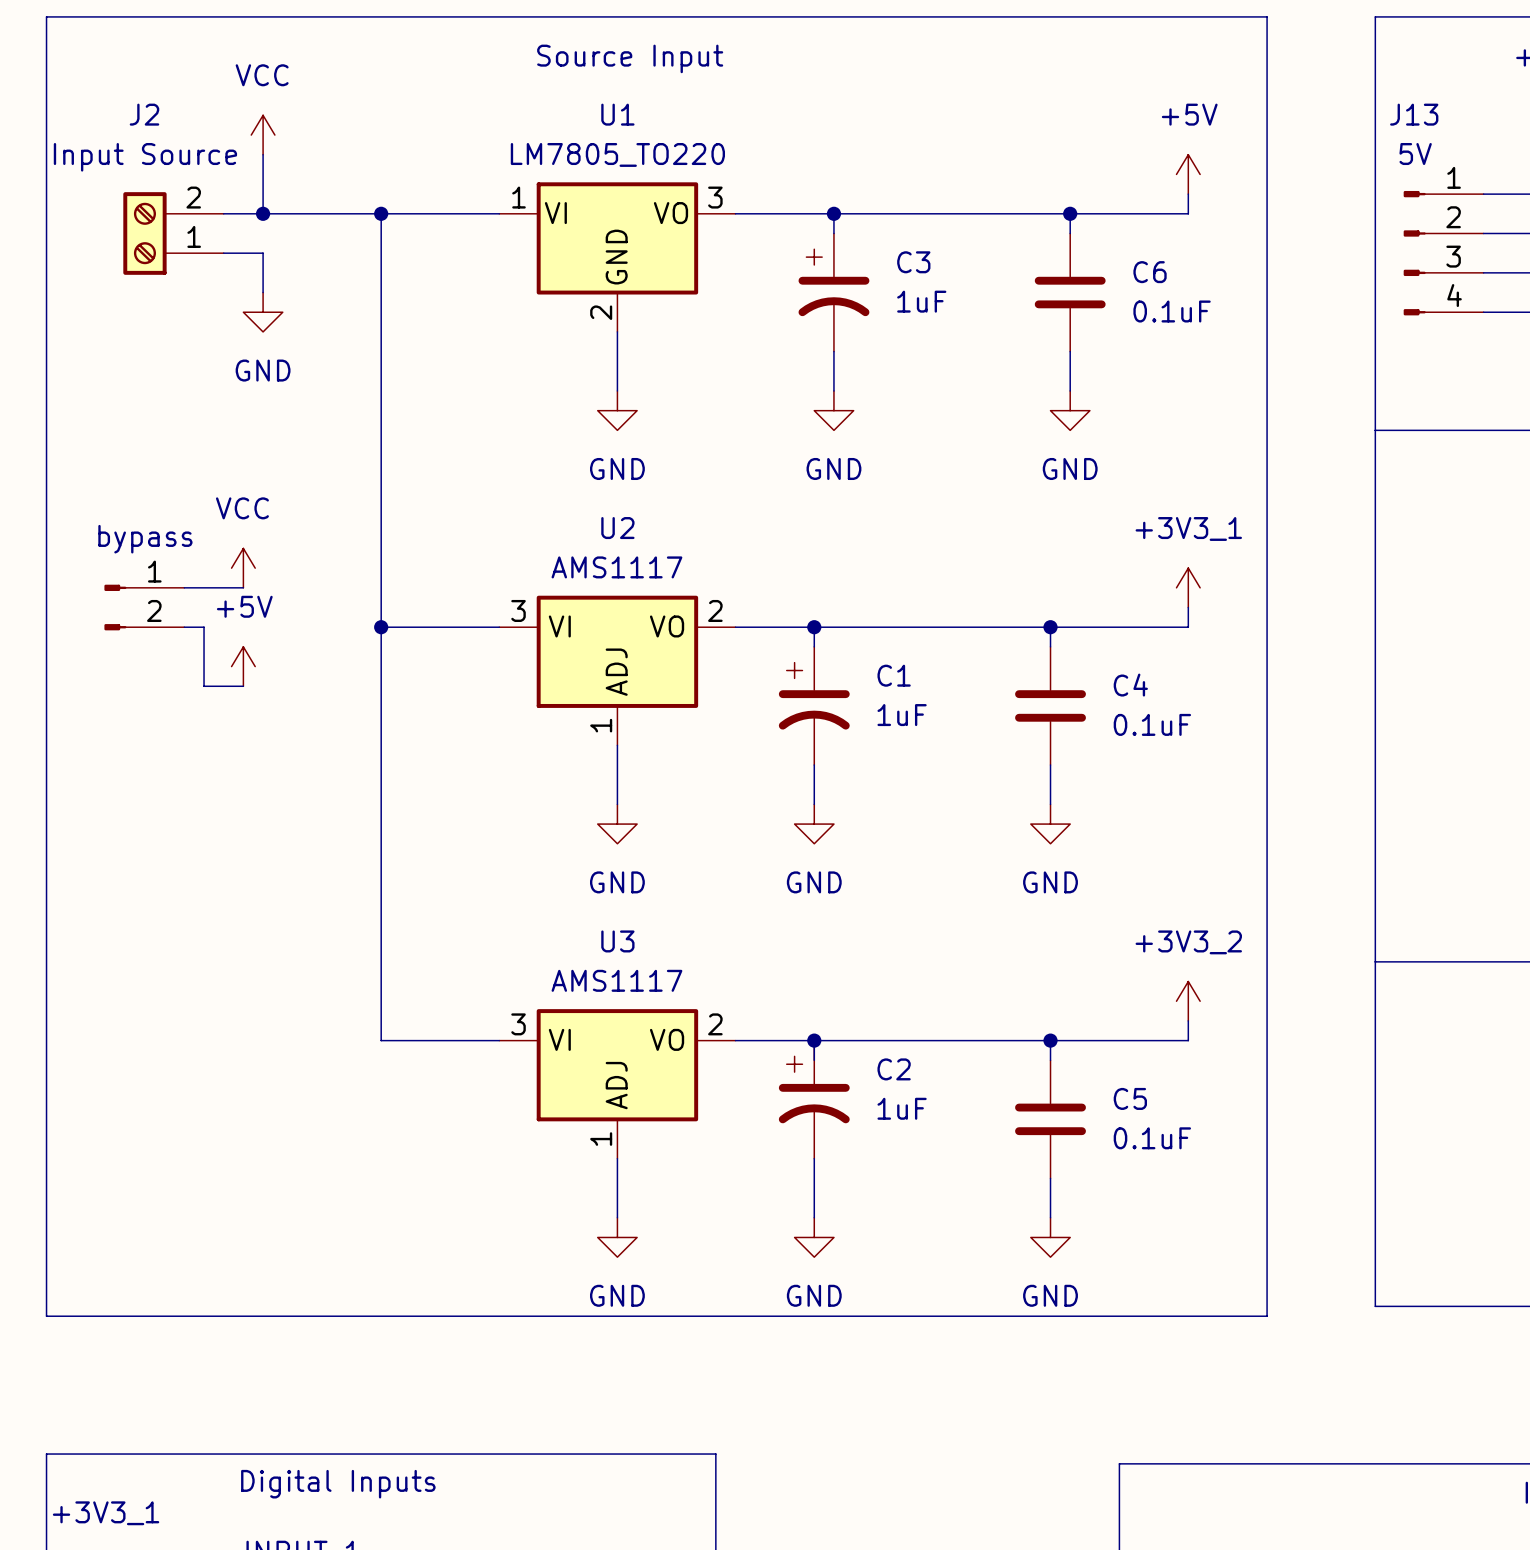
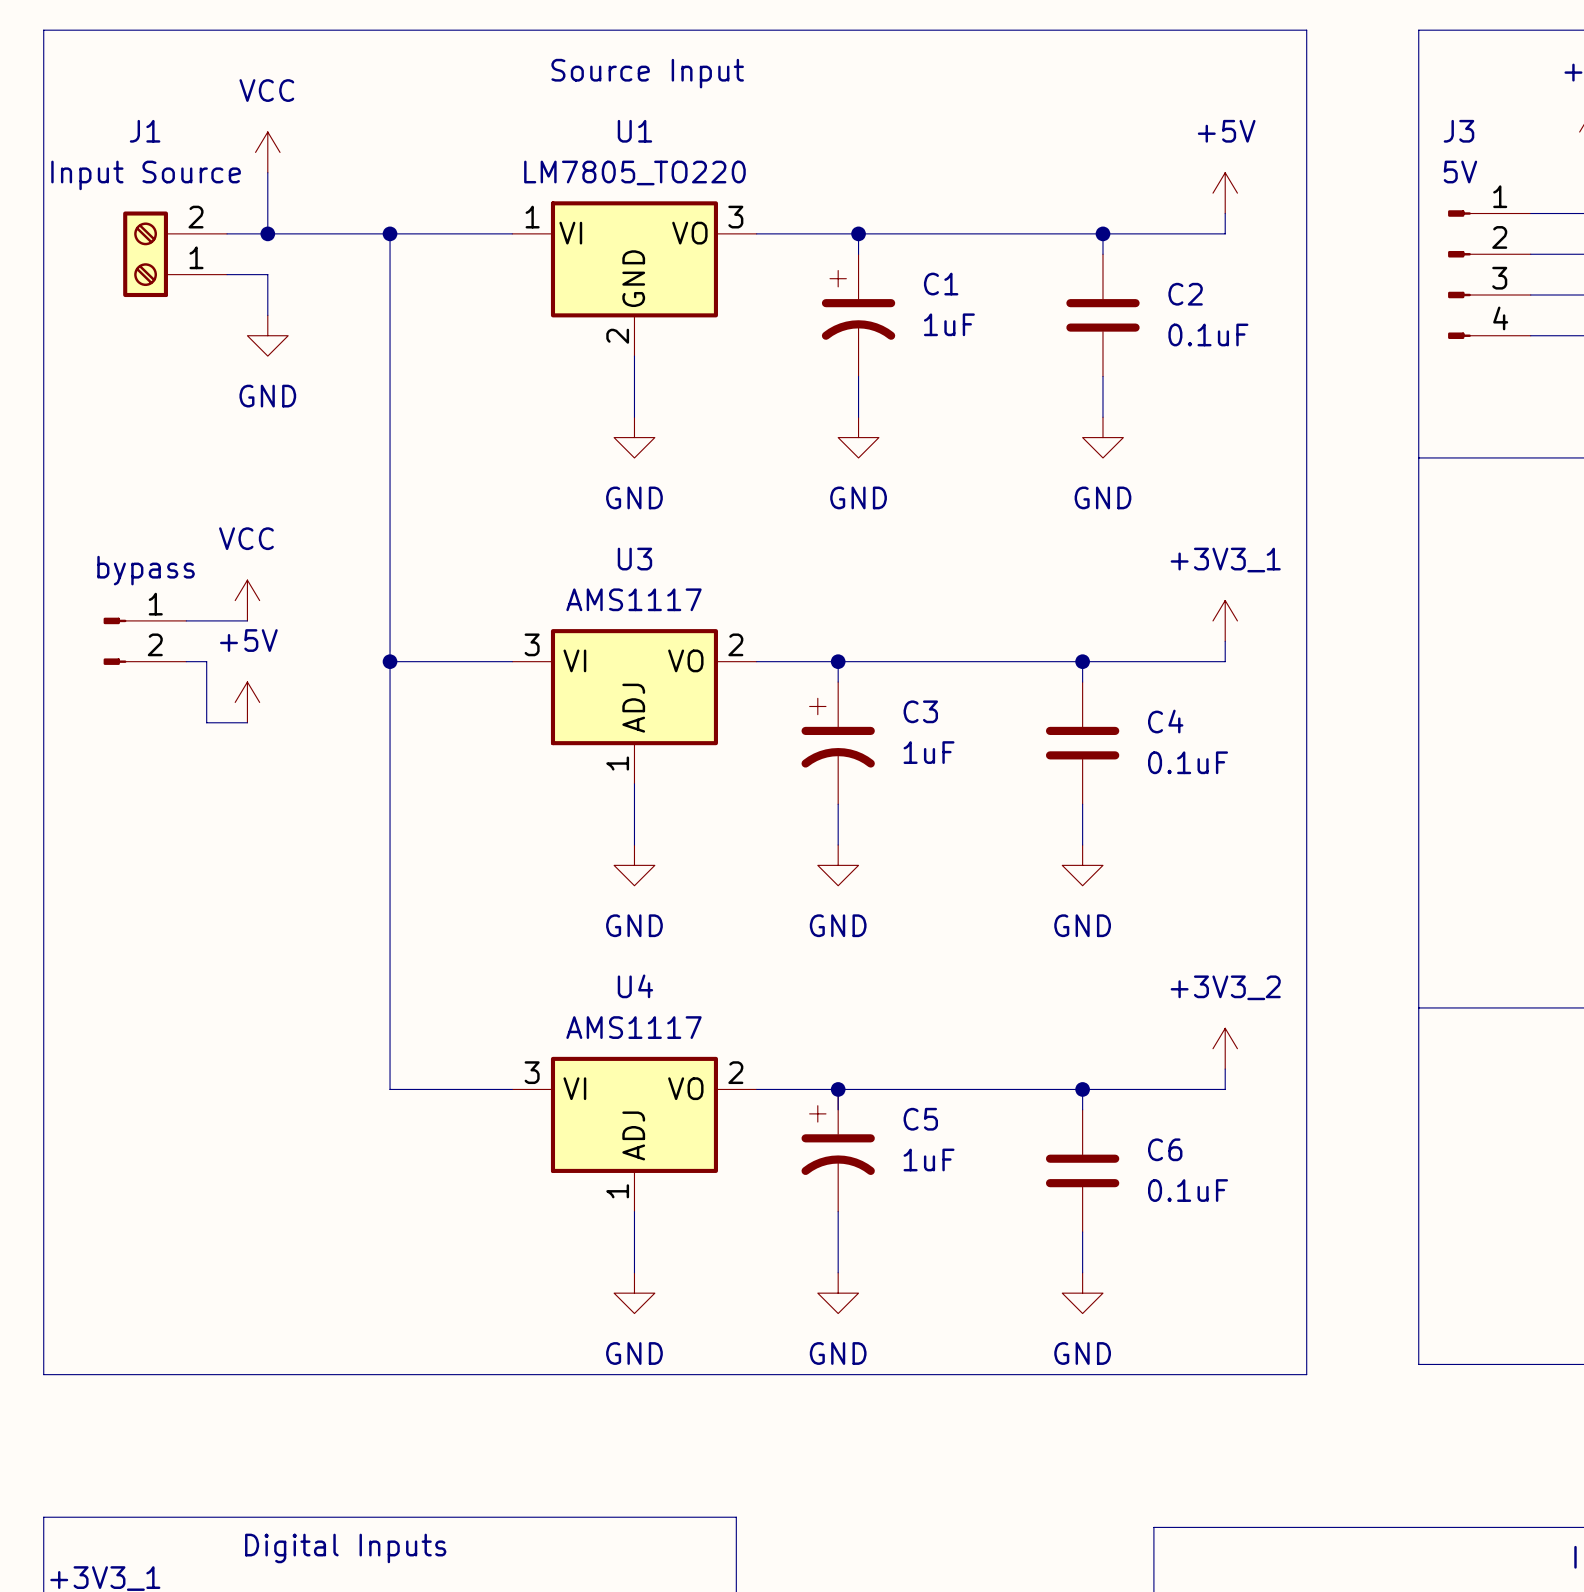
J2 name: J2 (144, 114) -> J1 (145, 131)
J13 name: J13 (1414, 114) -> J3 (1458, 131)
C3 name: C3 (913, 262) -> C1 (941, 284)
C6 name: C6 (1150, 272) -> C2 (1185, 294)
U2 name: U2 (617, 528) -> U3 (634, 559)
C1 name: C1 (894, 675) -> C3 (920, 711)
U3 name: U3 (617, 941) -> U4 (635, 986)
C2 name: C2 (894, 1069) -> C5 (920, 1119)
C5 name: C5 (1130, 1098) -> C6 (1165, 1149)

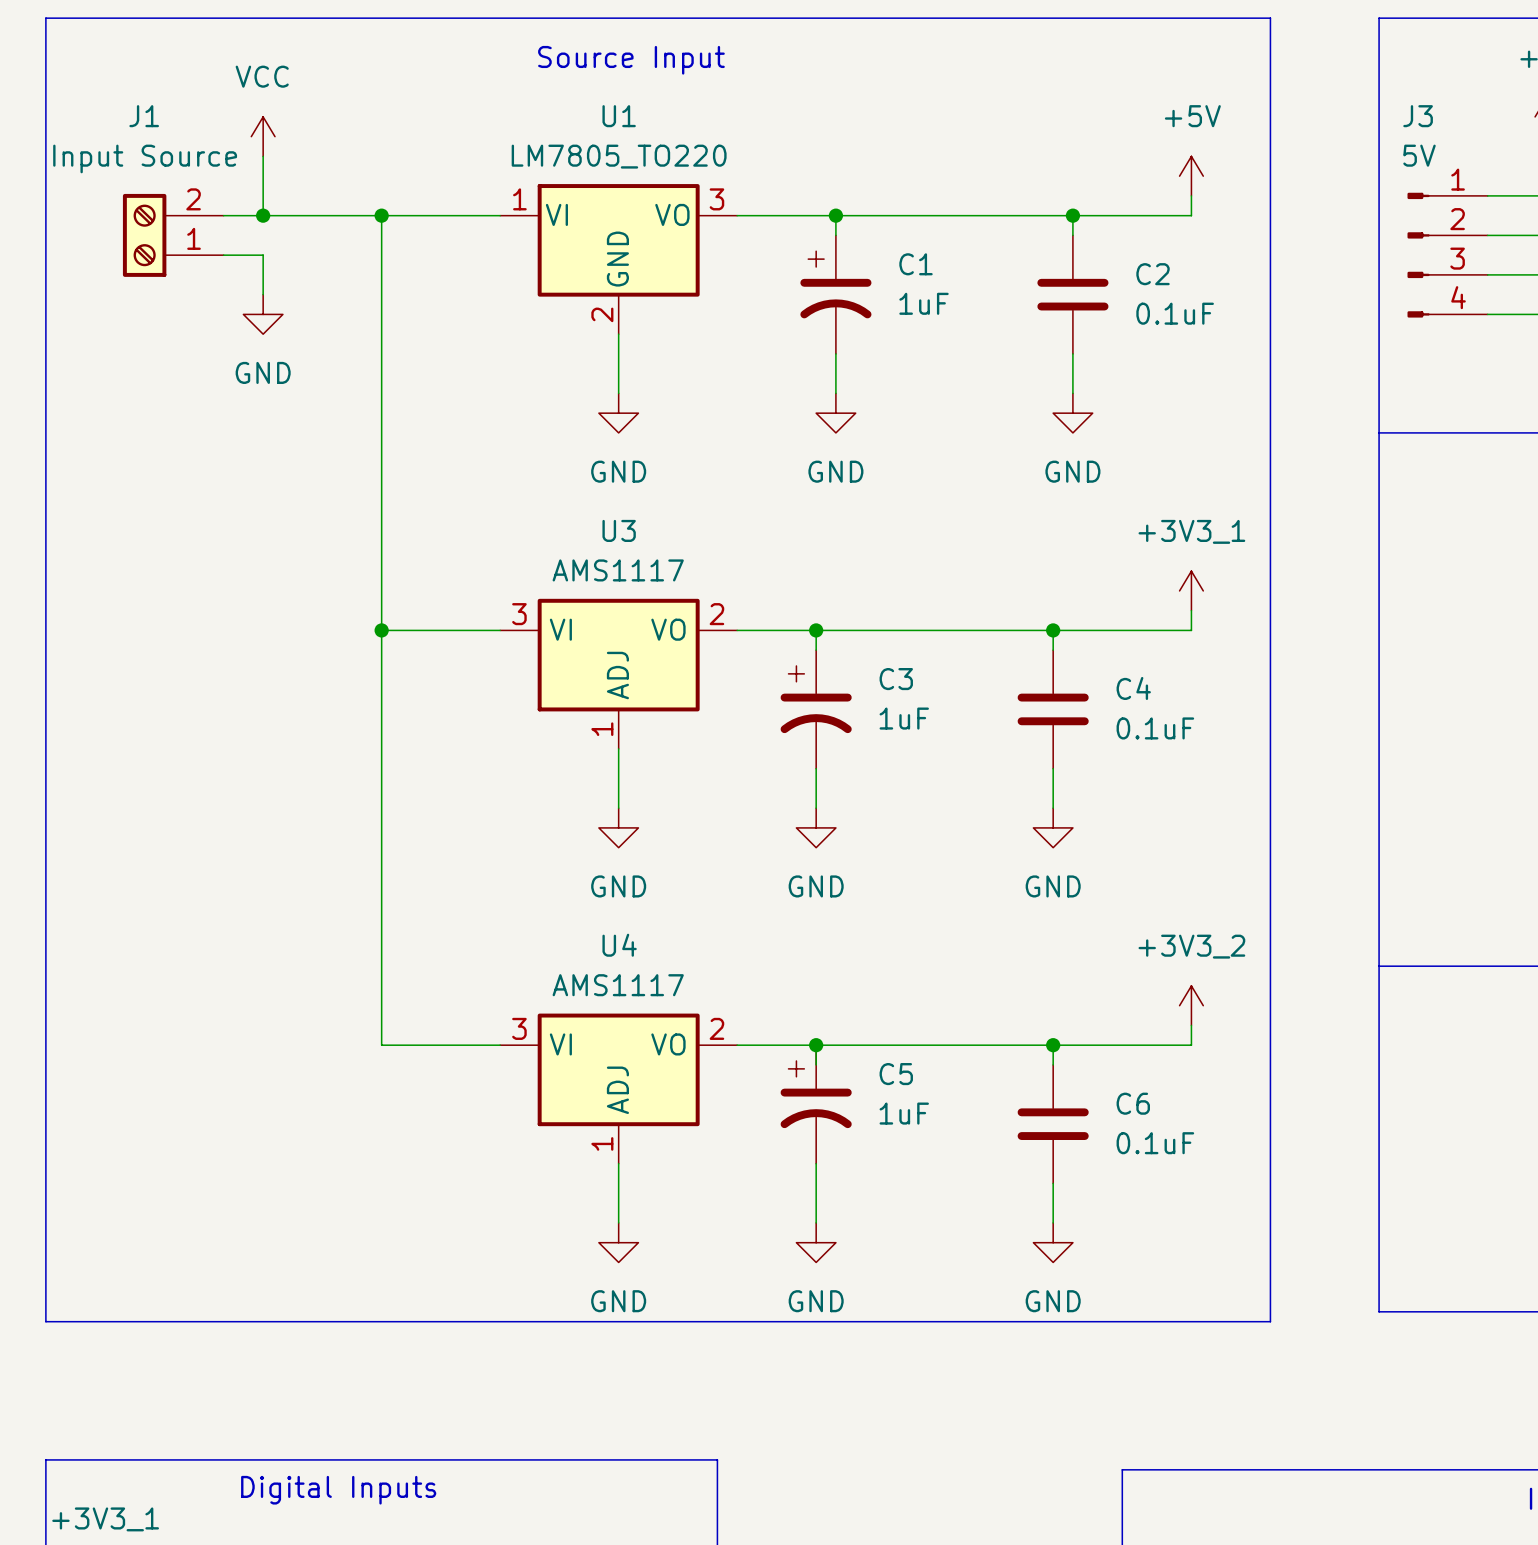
power symbol: VCC (247, 600) -> none
wire: (186, 620) (247, 620) -> none
part: bypass (144, 641) -> none
wire: (186, 661) (206, 661) (206, 722) (247, 722) -> none
power symbol: +5V (247, 702) -> none

